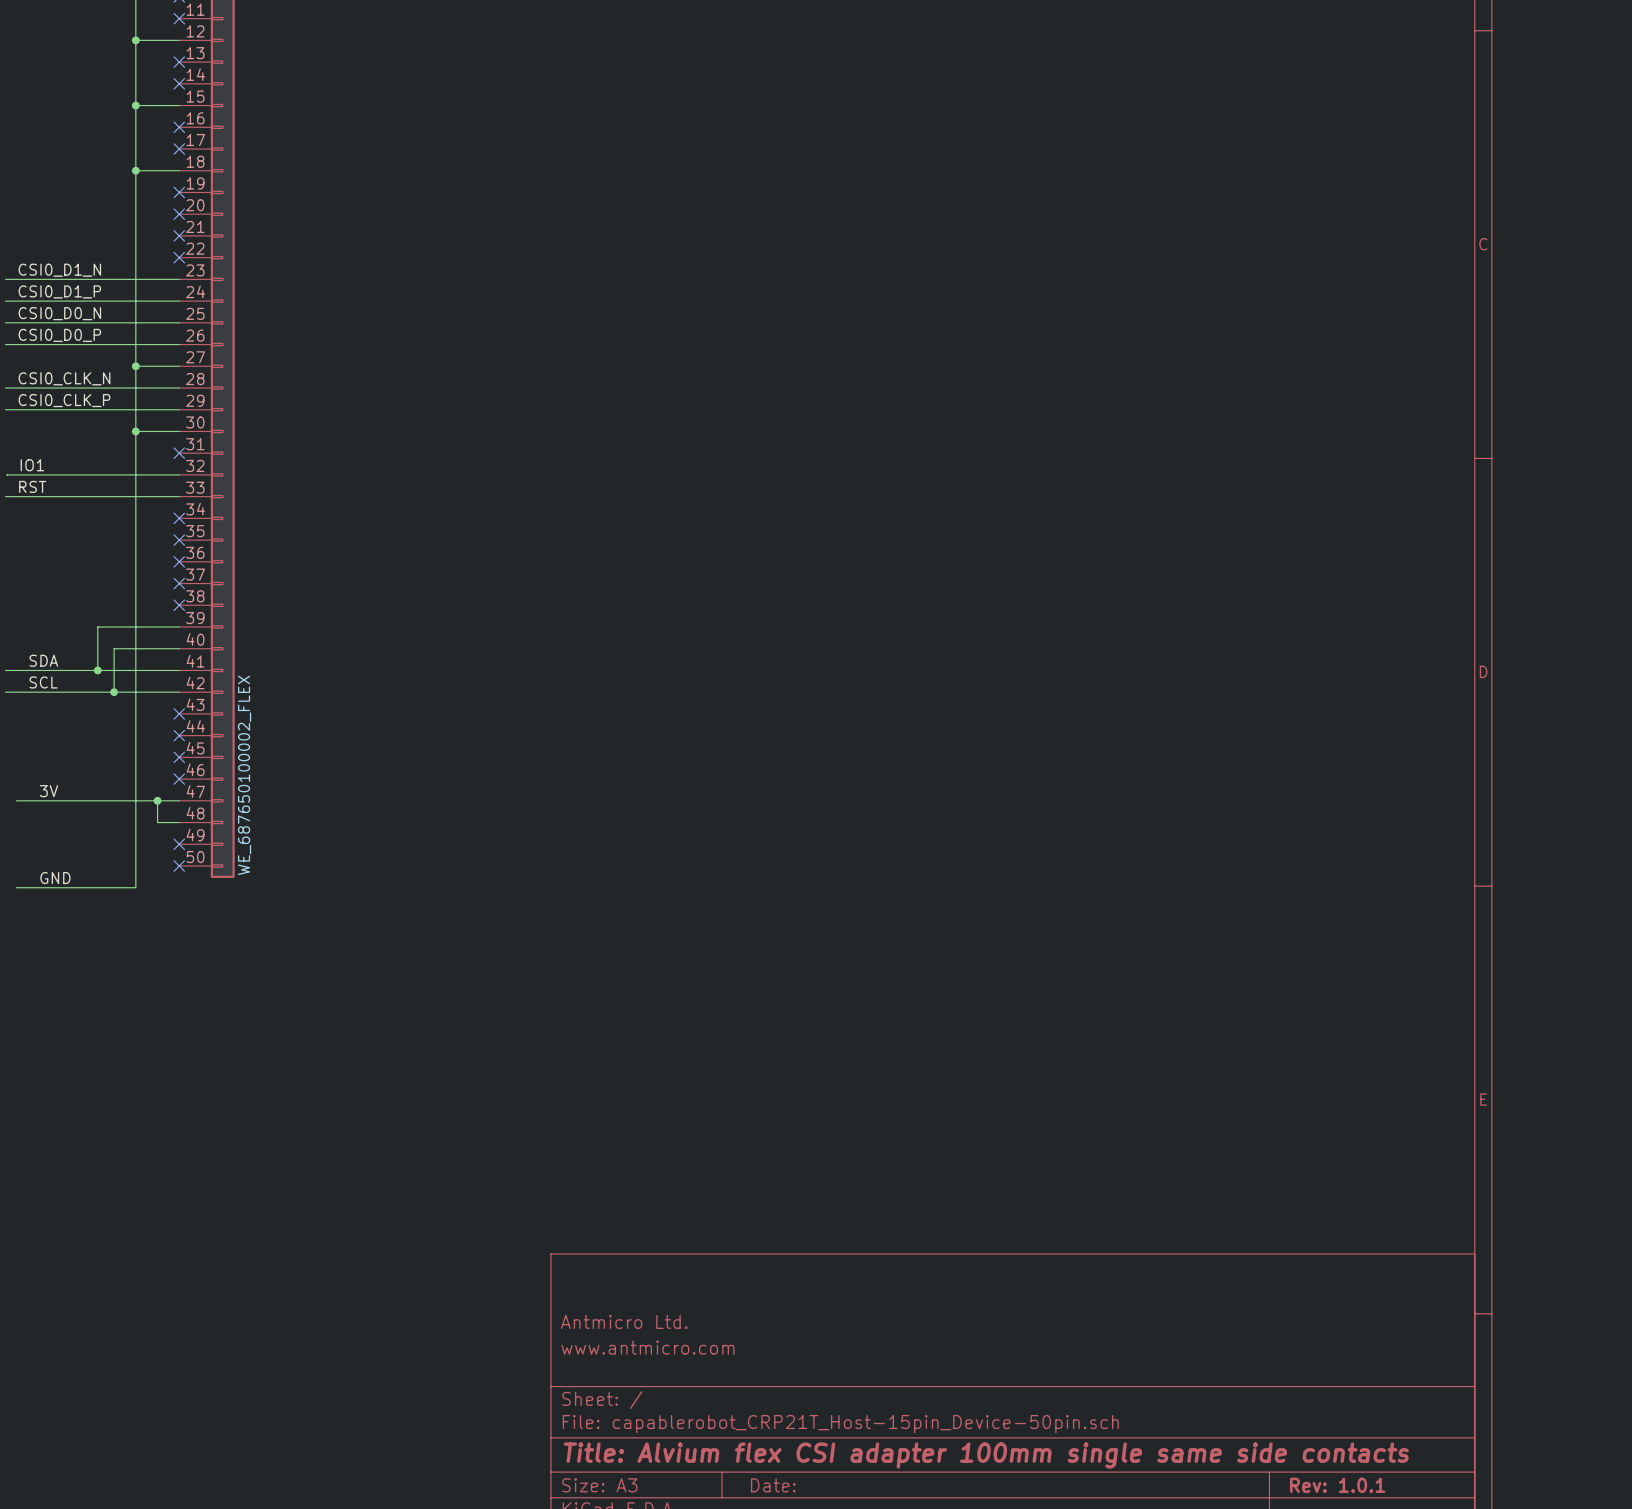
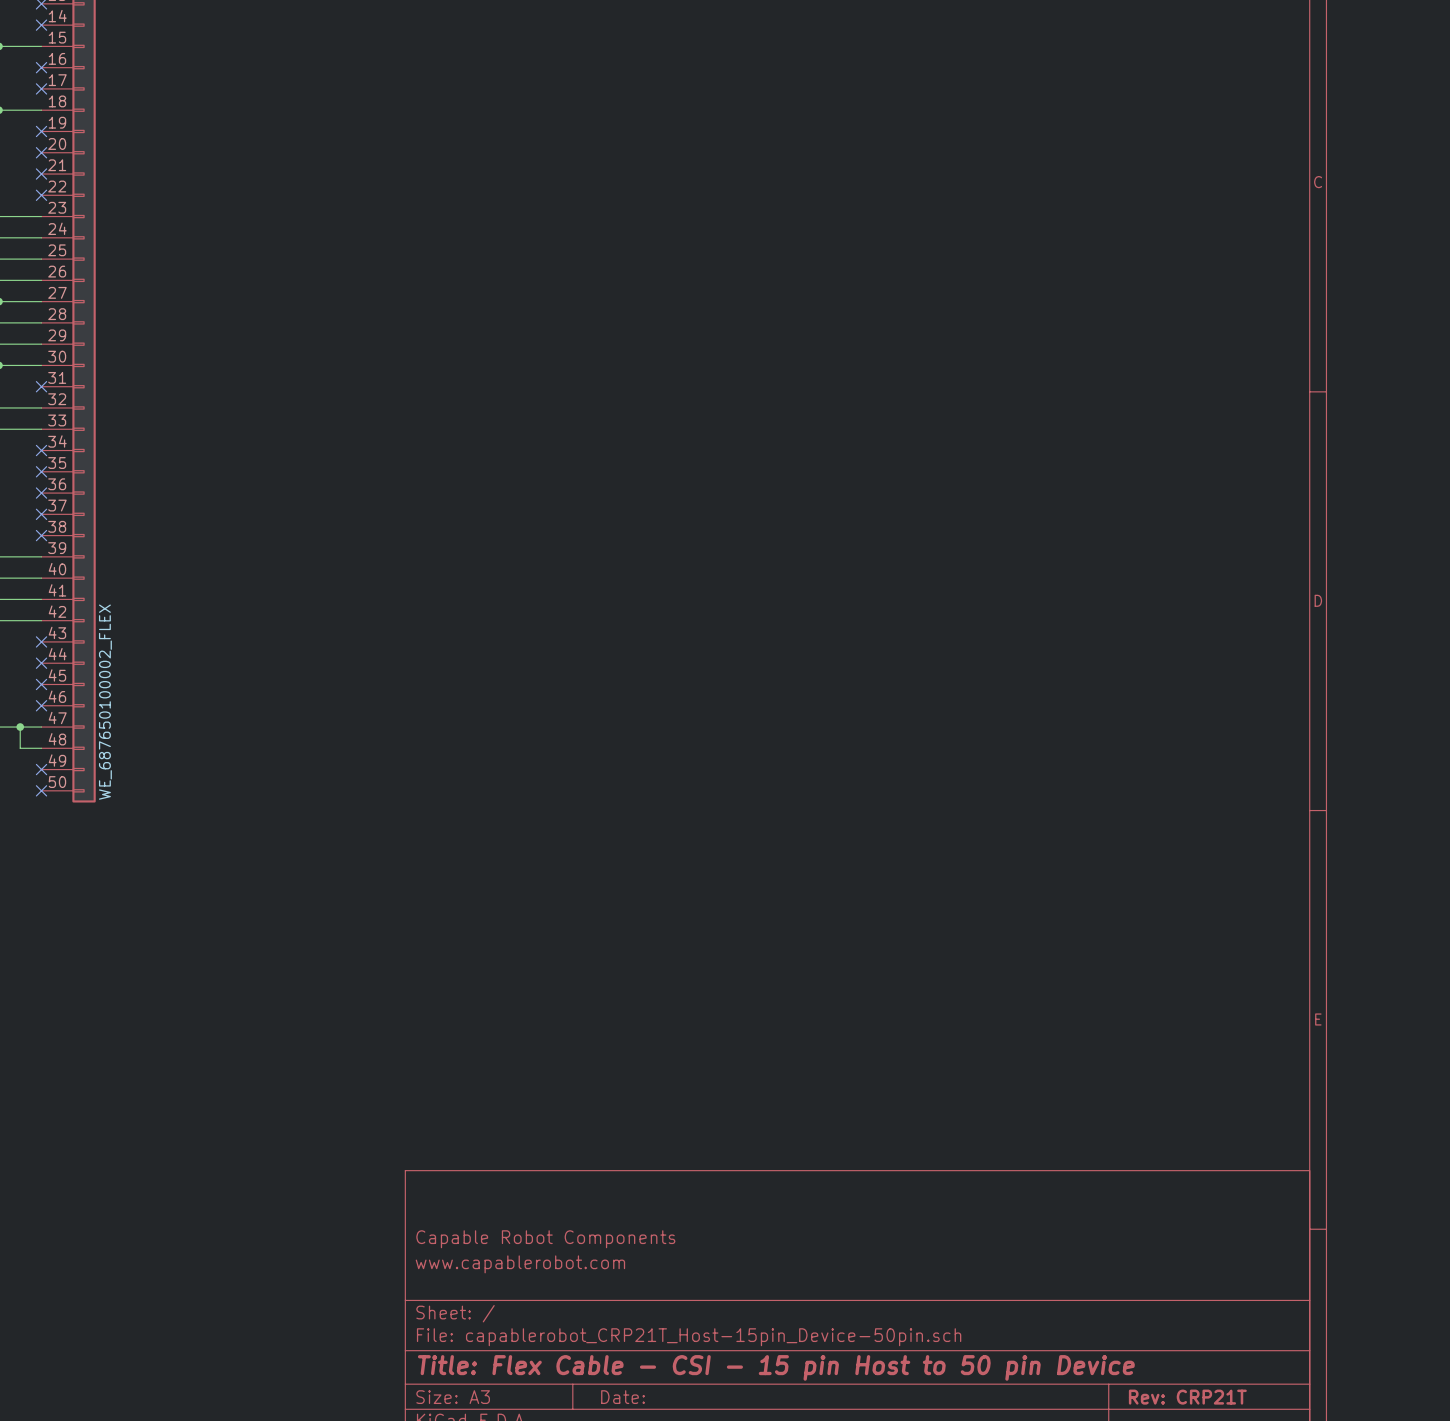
title block: Antmicro Ltd. (624, 1321) -> Capable Robot Components (545, 1239)
title block: www.antmicro.com (648, 1347) -> www.capablerobot.com (520, 1264)
title block: Title: Alvium flex CSI adapter 100mm single same side contacts (986, 1455) -> Title: Flex Cable - CSI - 15 pin Host to 50 pin Device (776, 1367)
title block: Rev: 1.0.1 (1337, 1485) -> Rev: CRP21T (1187, 1397)

